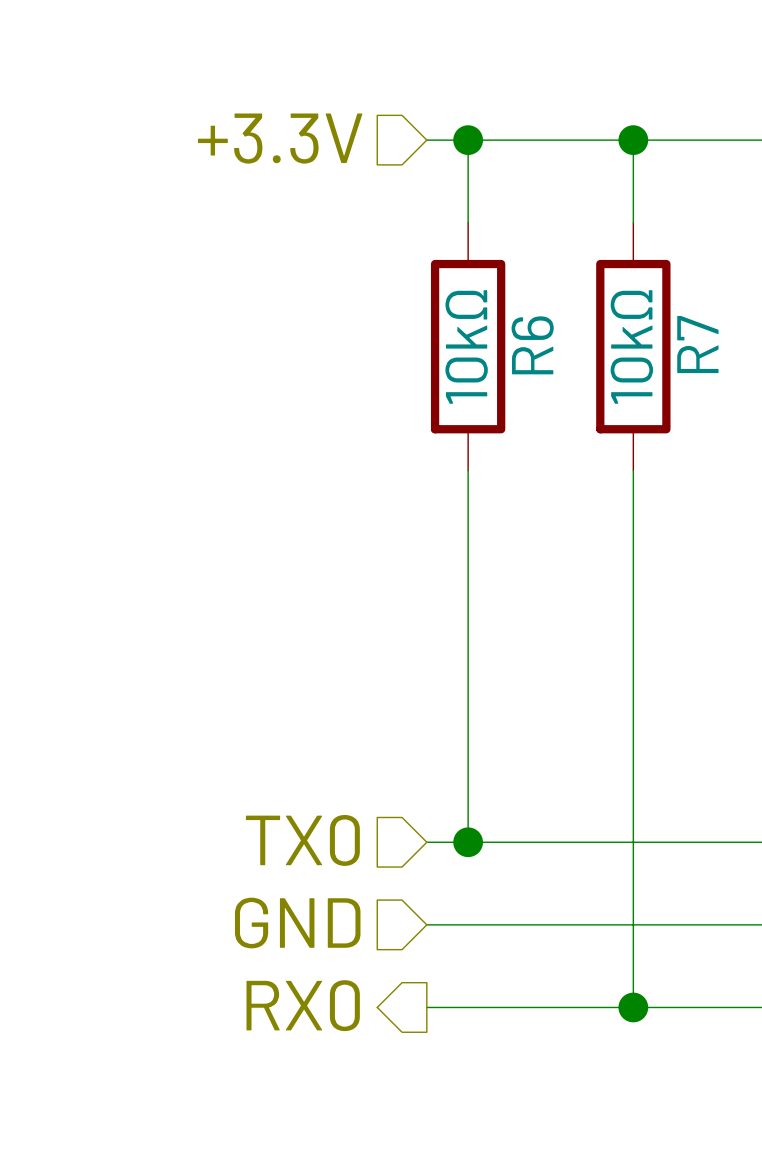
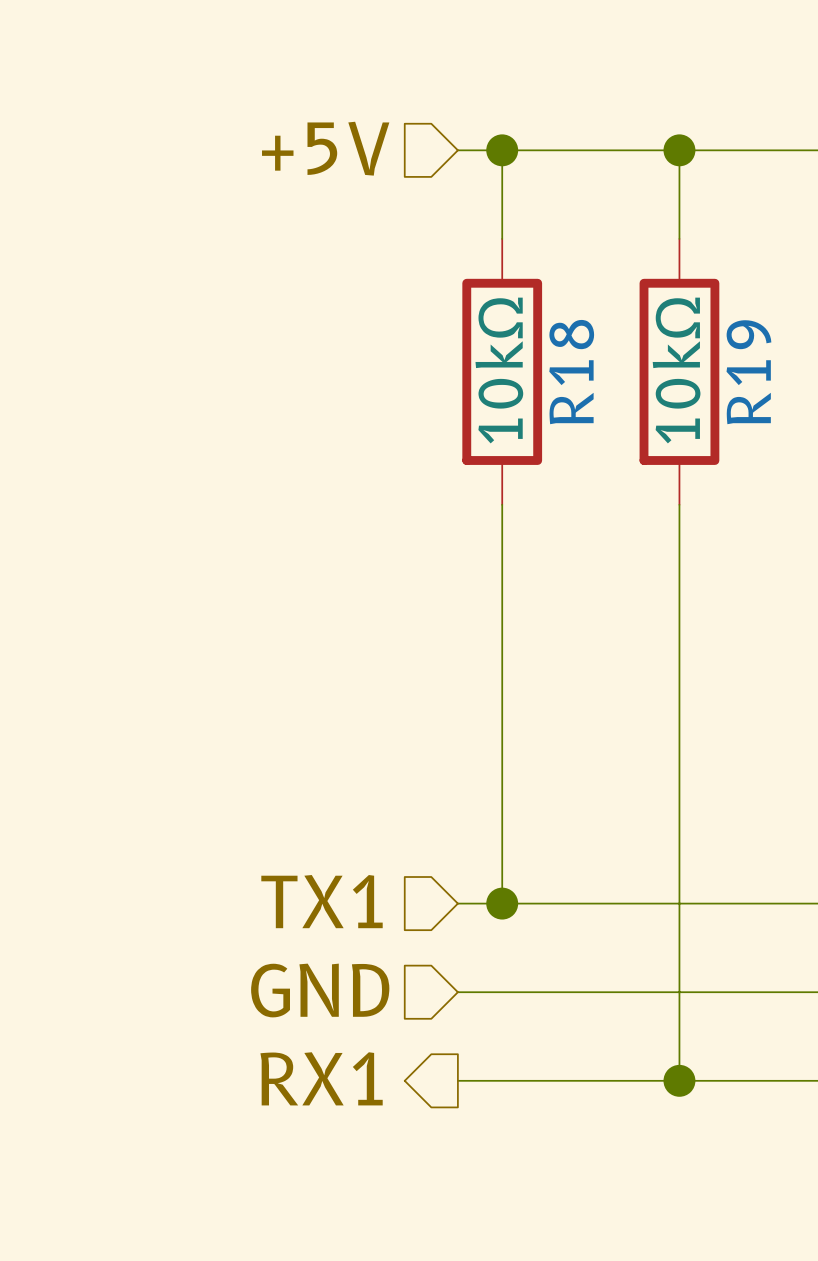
hierarchical label: +3.3V (280, 138) -> +5V (325, 148)
R7 name: R7 (697, 344) -> R19 (748, 372)
R6 name: R6 (532, 345) -> R18 (571, 372)
hierarchical label: TX0 (302, 840) -> TX1 (322, 901)
hierarchical label: RX0 (303, 1005) -> RX1 (321, 1078)

